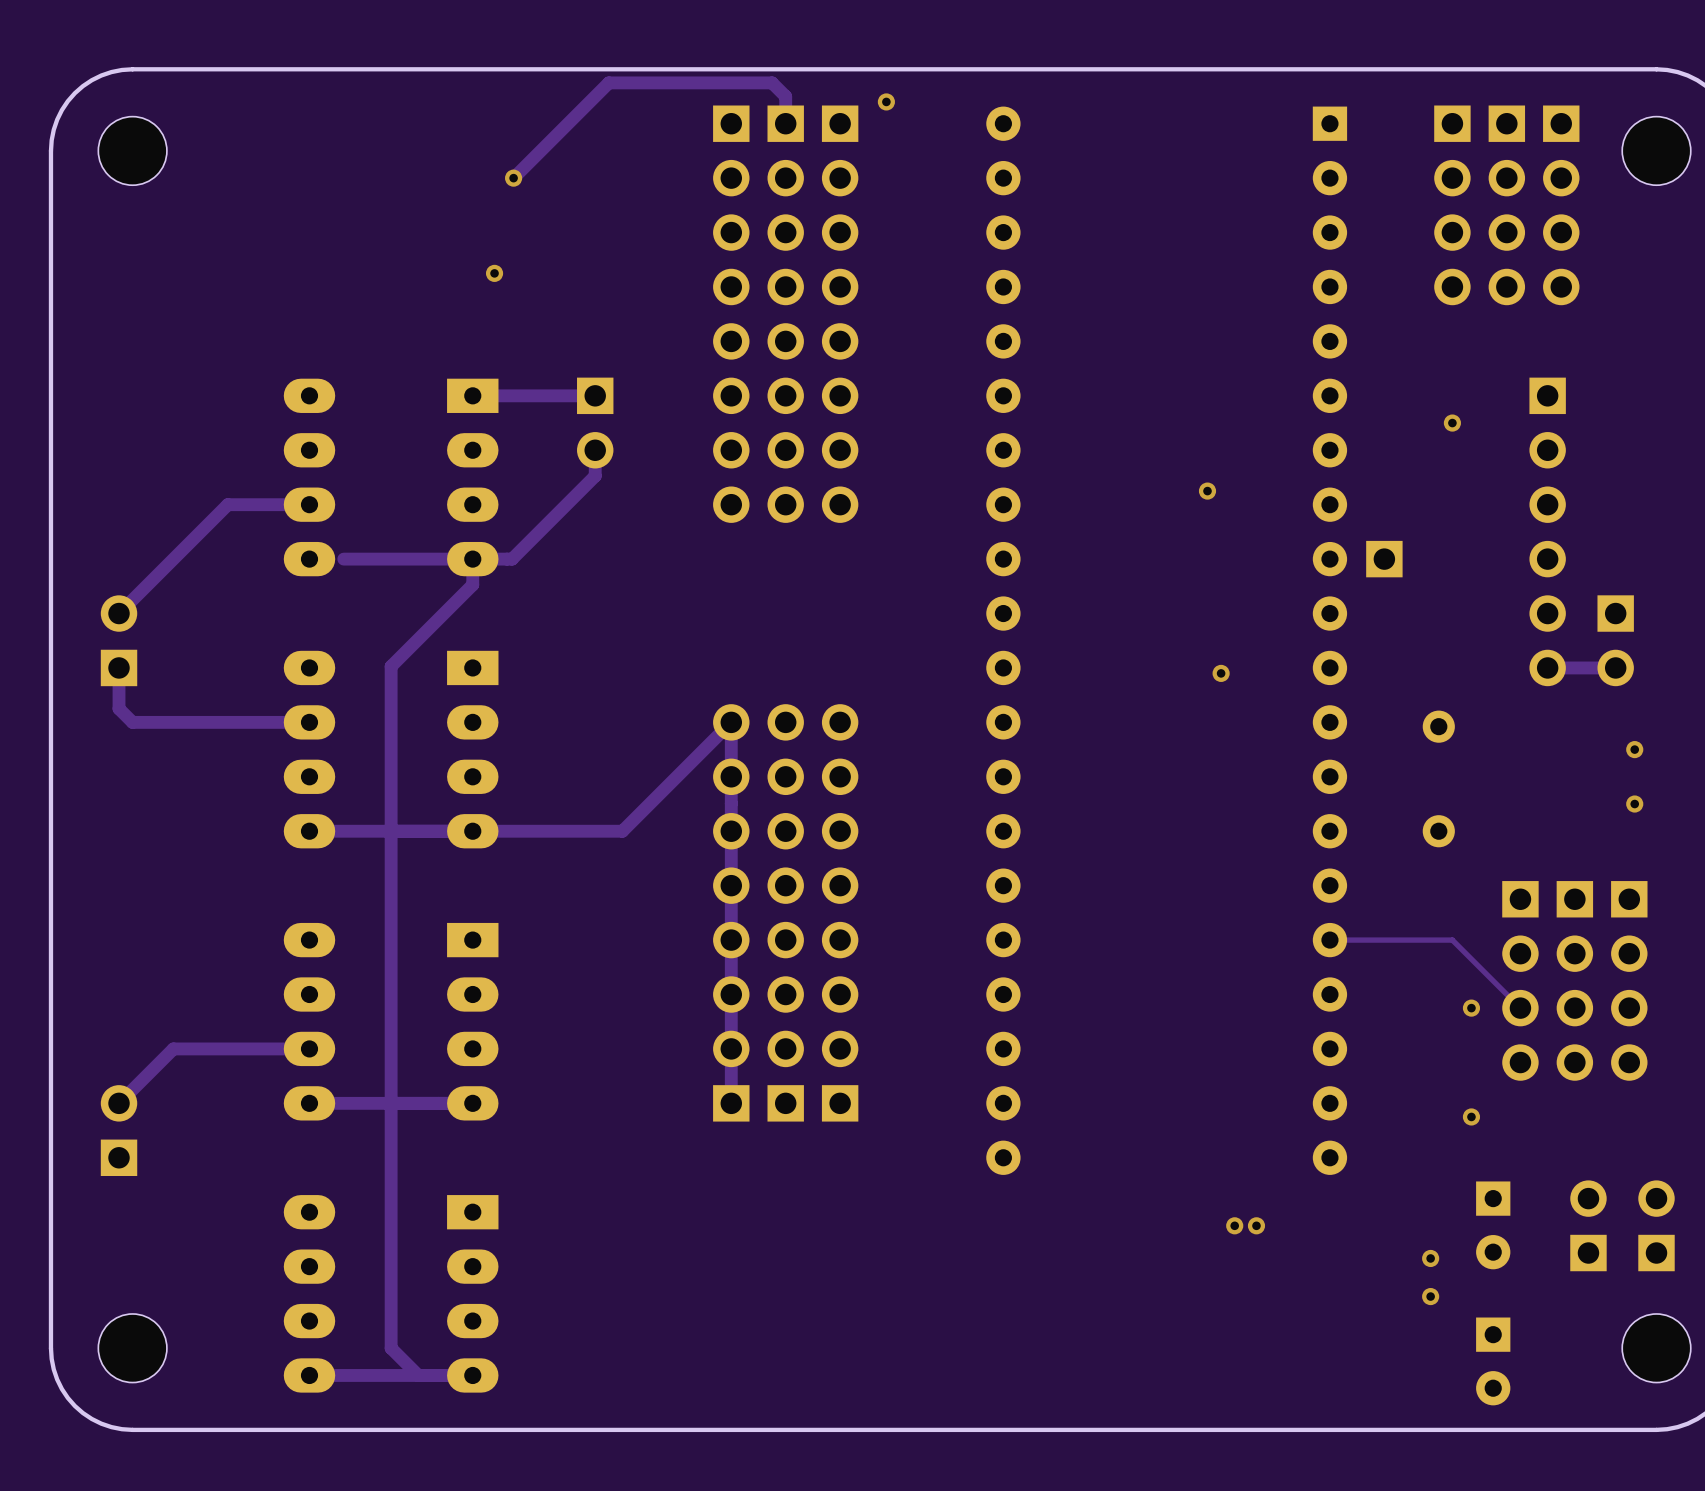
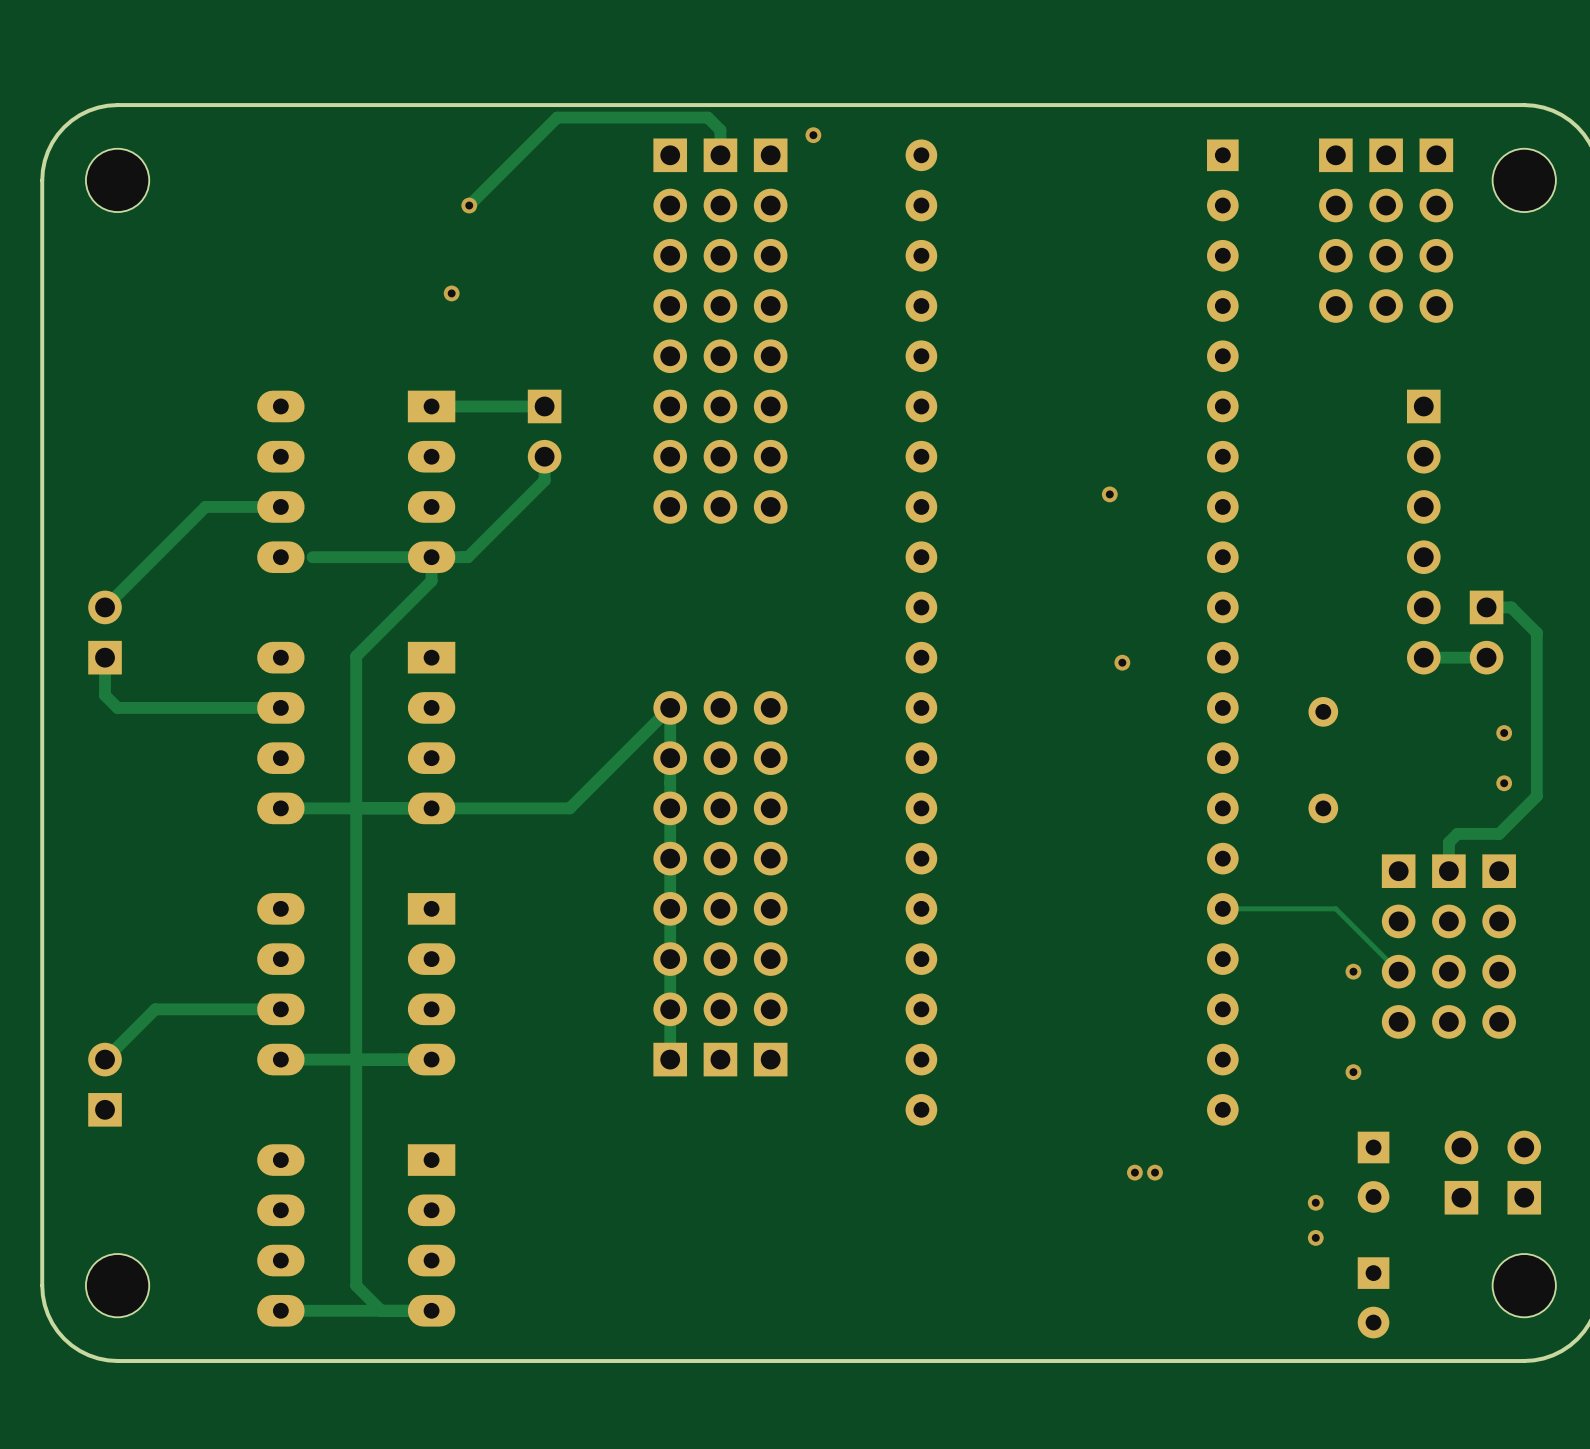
via: (1452, 423) -> none
part: (1384, 559) -> none
track: none -> (1486, 607) (1511, 607) (1536, 632) (1536, 796) (1499, 833) (1457, 833) (1448, 842) (1448, 871)

